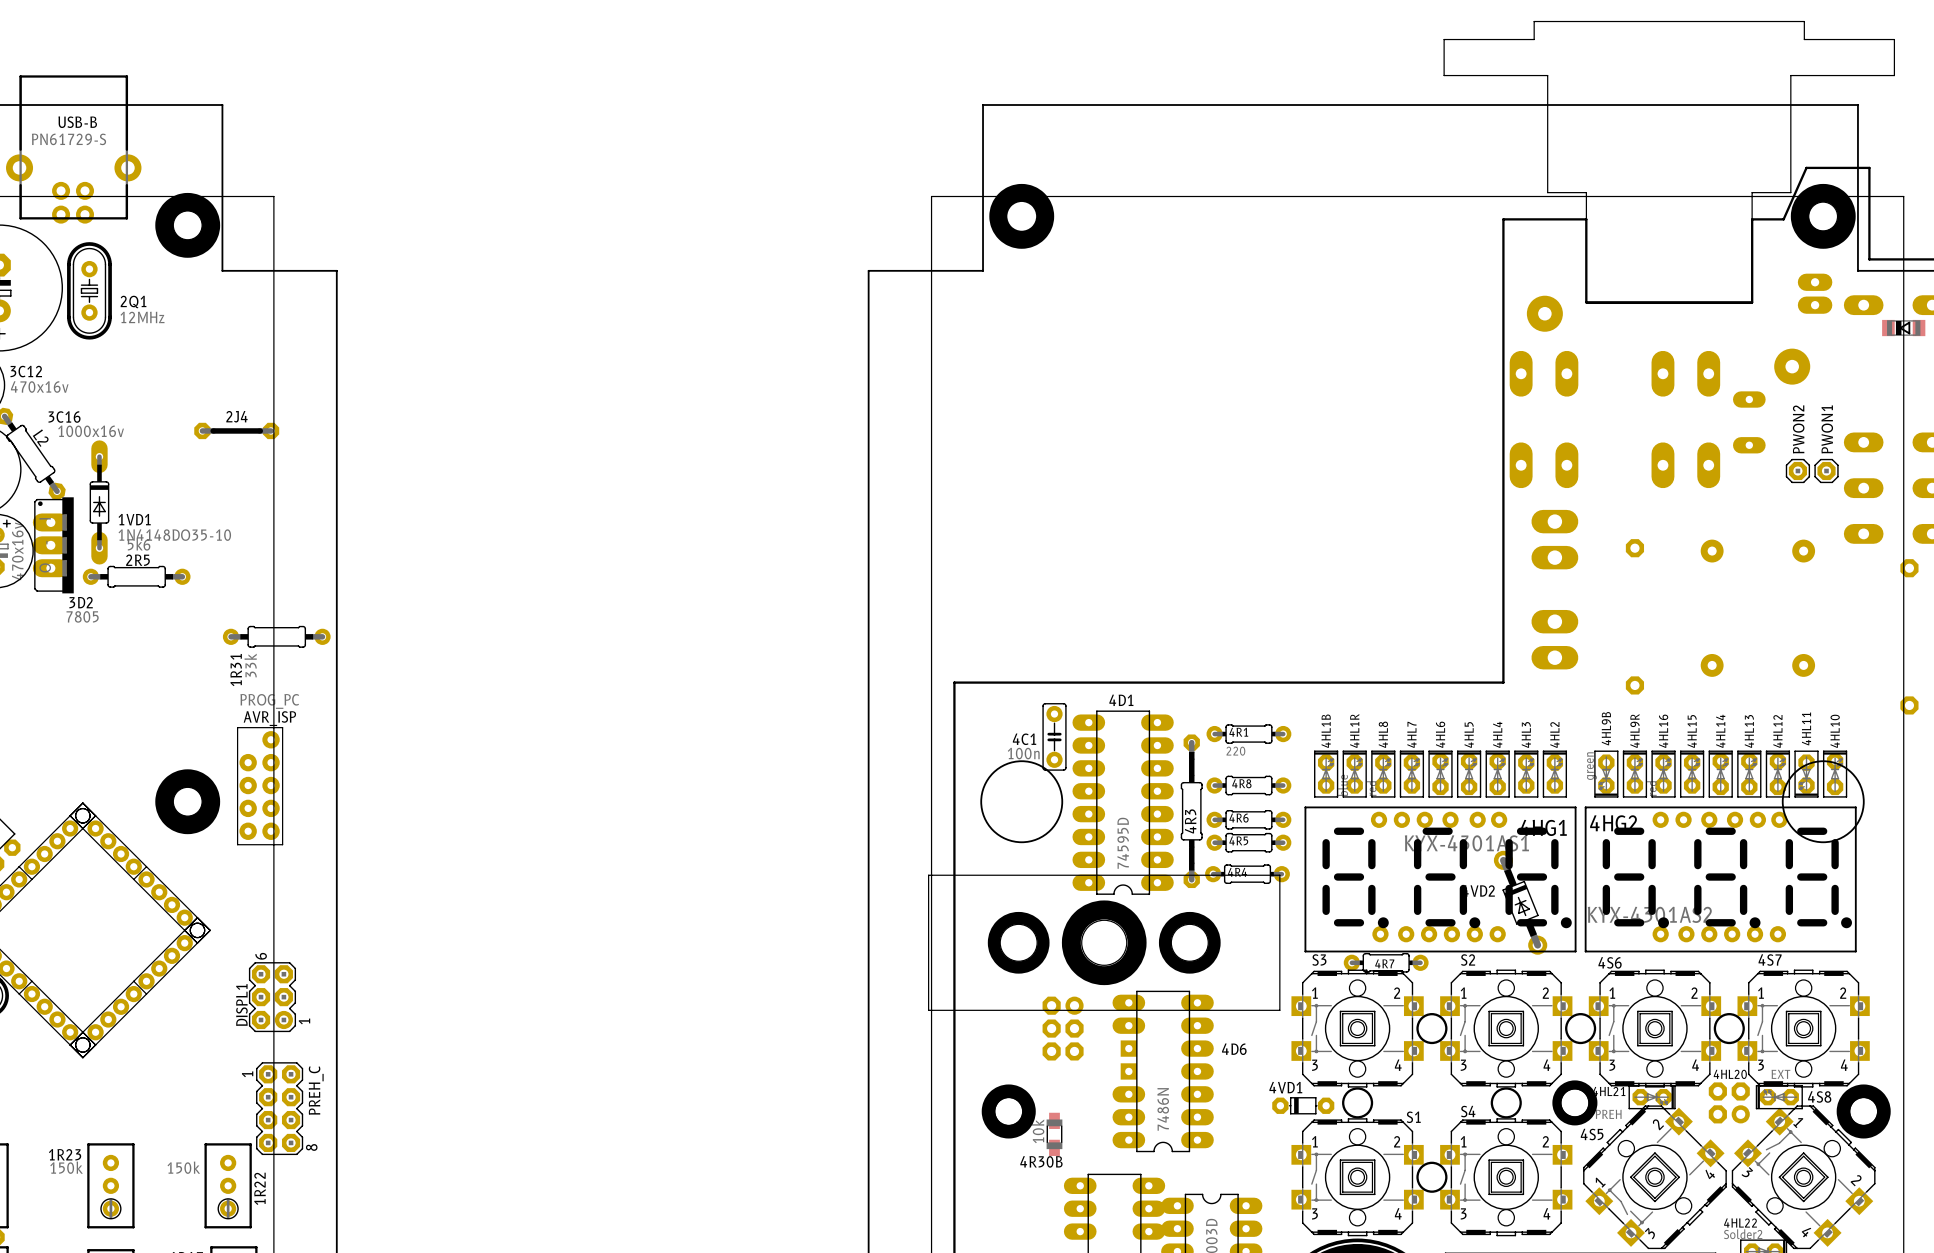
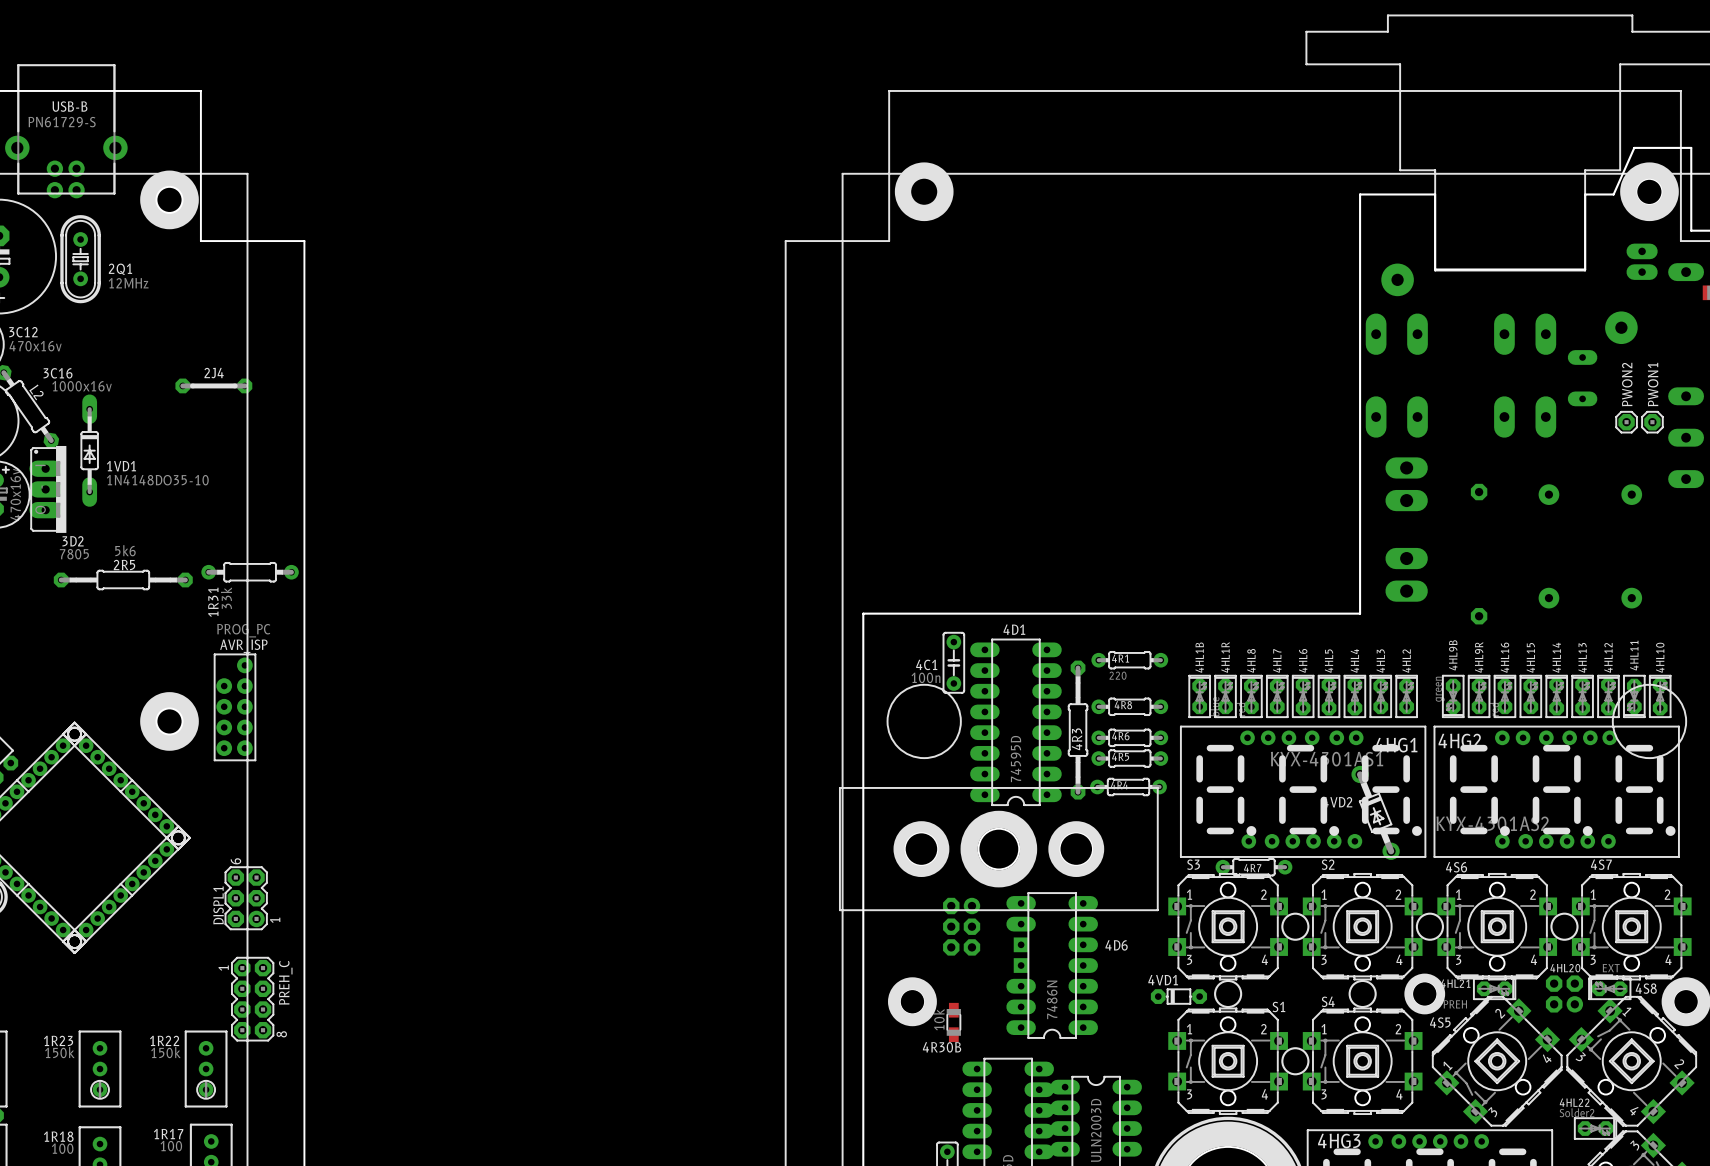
2R5 footprint: [82, 565, 191, 588] -> [53, 570, 193, 590]
1R22 name rotation: 0° (259, 1188) -> 90° clockwise (164, 1040)
1R22 name position: 1R22 (259, 1188) -> 1R22 (164, 1040)

